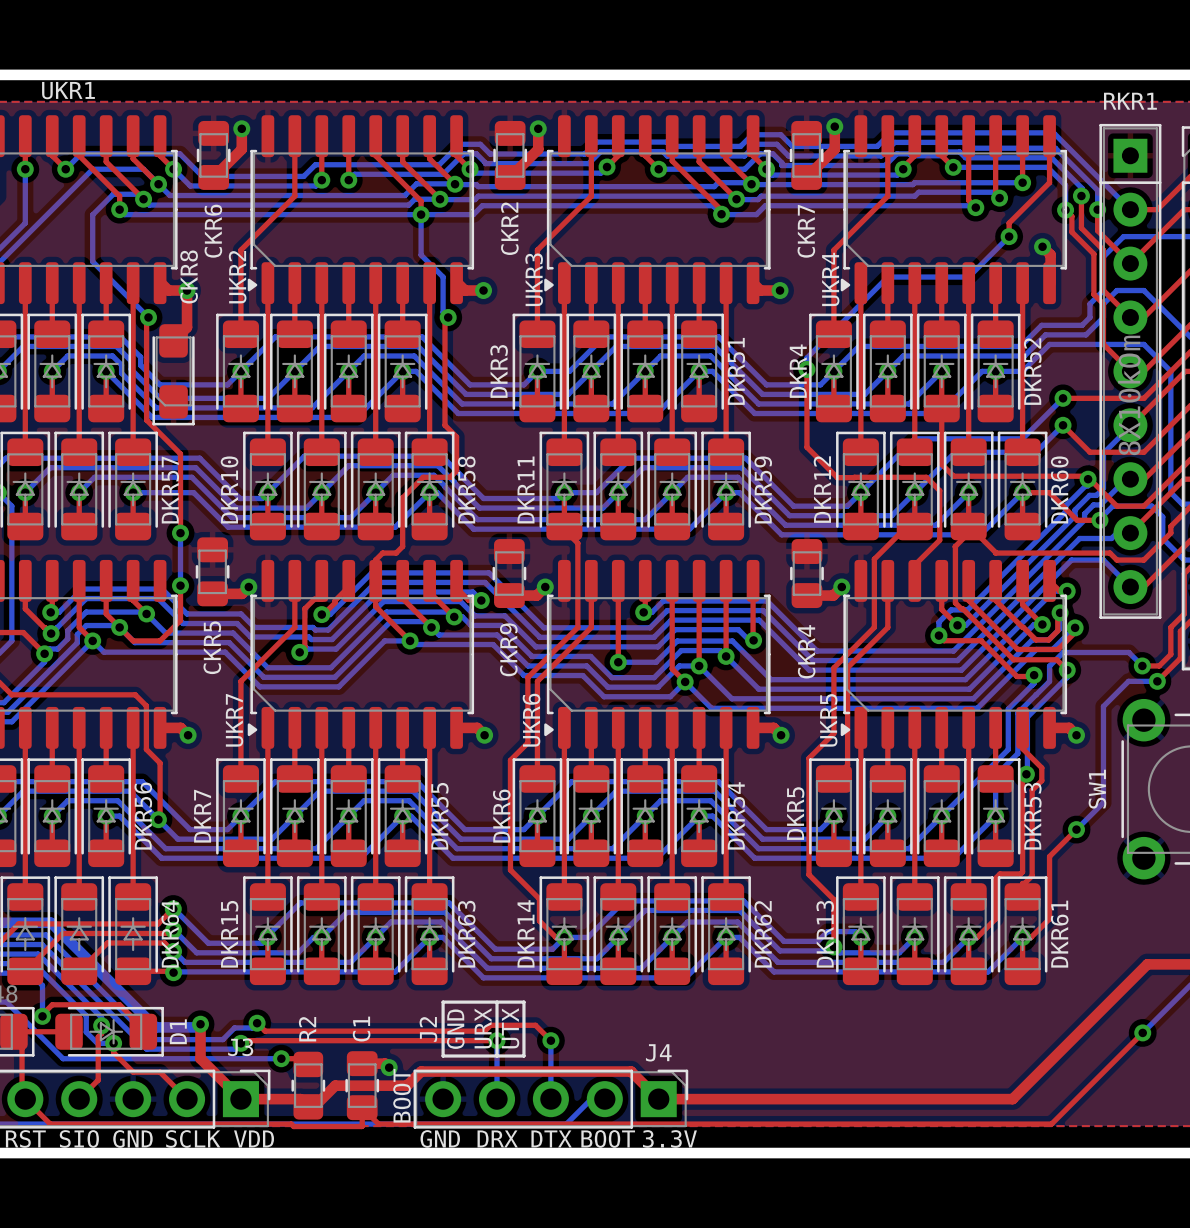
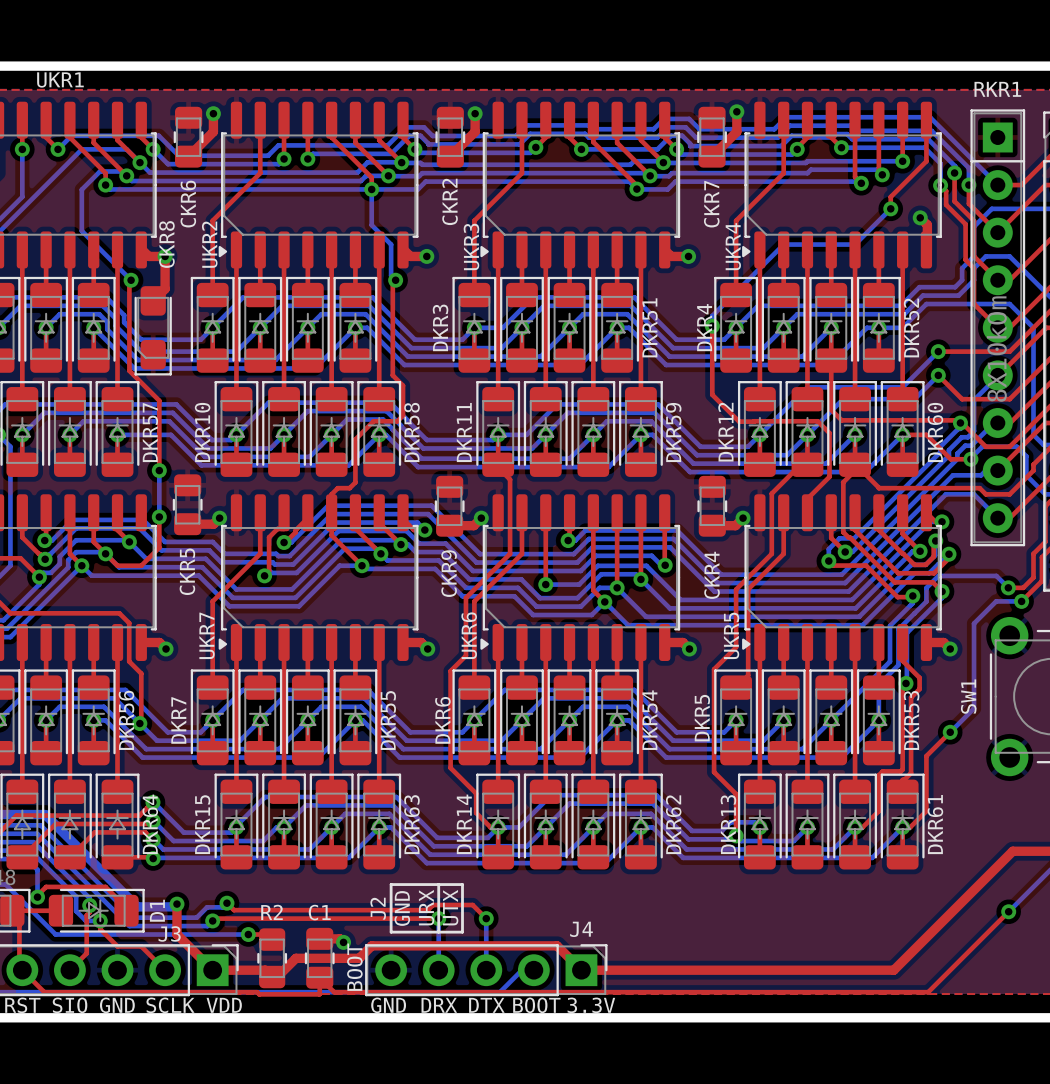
R2 name rotation: 0° (307, 1029) -> 90° clockwise (272, 912)
C1 name rotation: 0° (361, 1029) -> 90° clockwise (319, 912)
J3 name position: J3 (240, 1047) -> J3 (169, 933)

